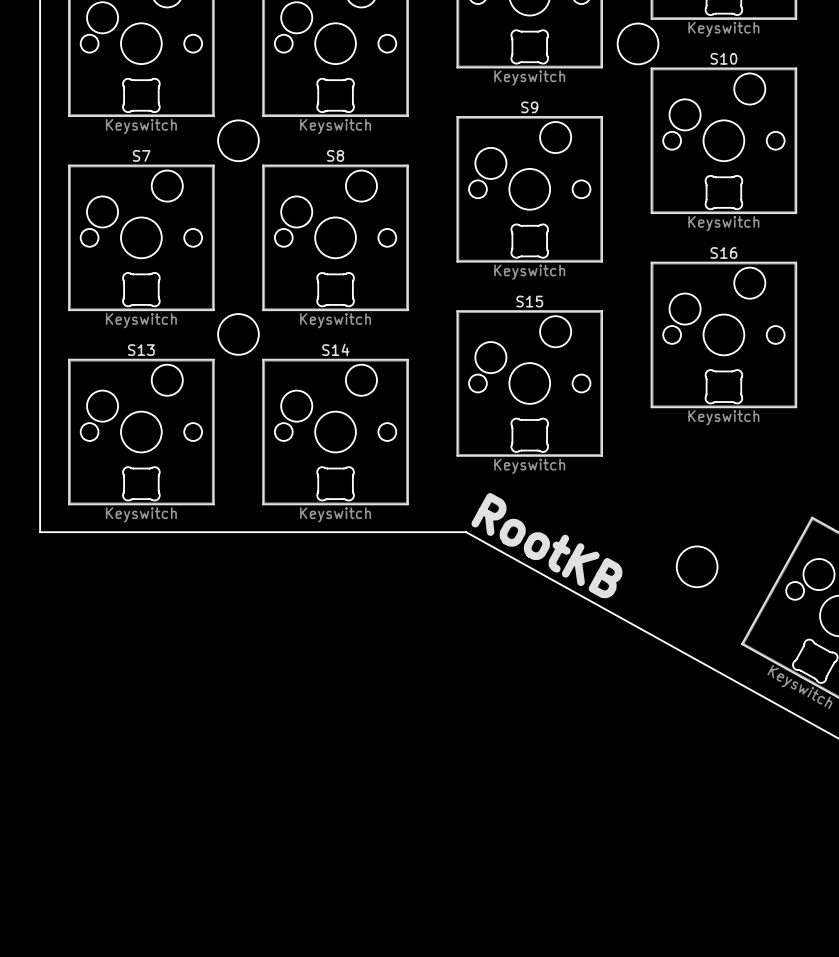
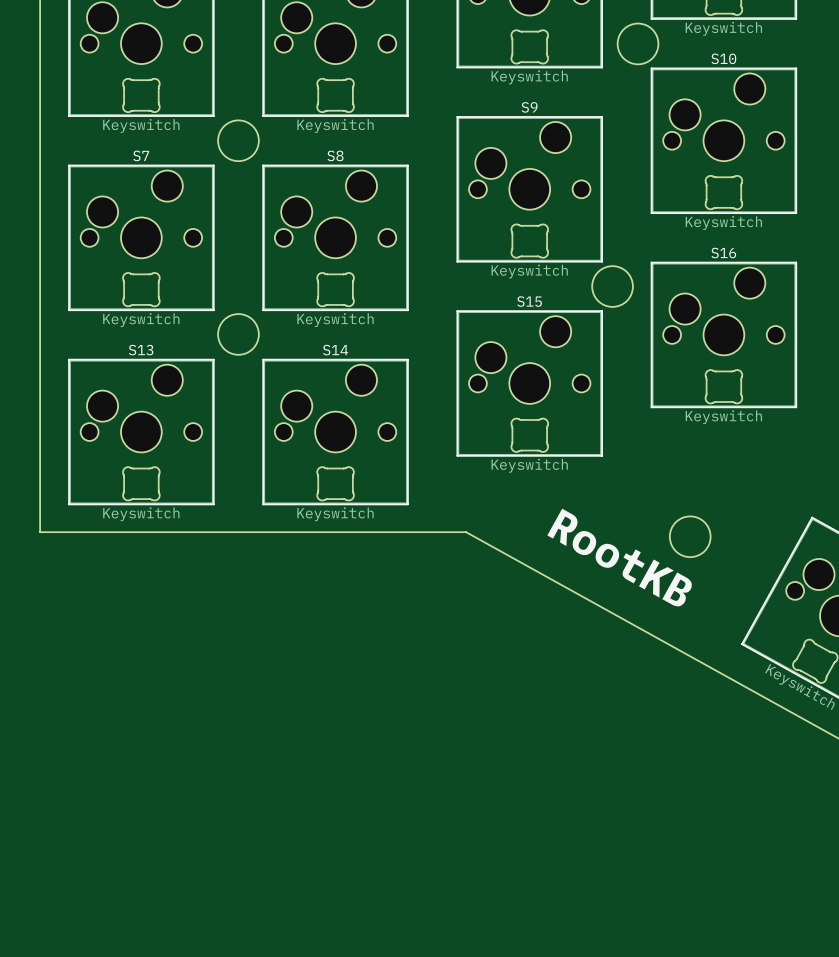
round board edge: none -> [591, 265, 634, 308]
text position: RootKB (546, 545) -> RootKB (619, 557)
round board edge position: (697, 566) -> (690, 536)

